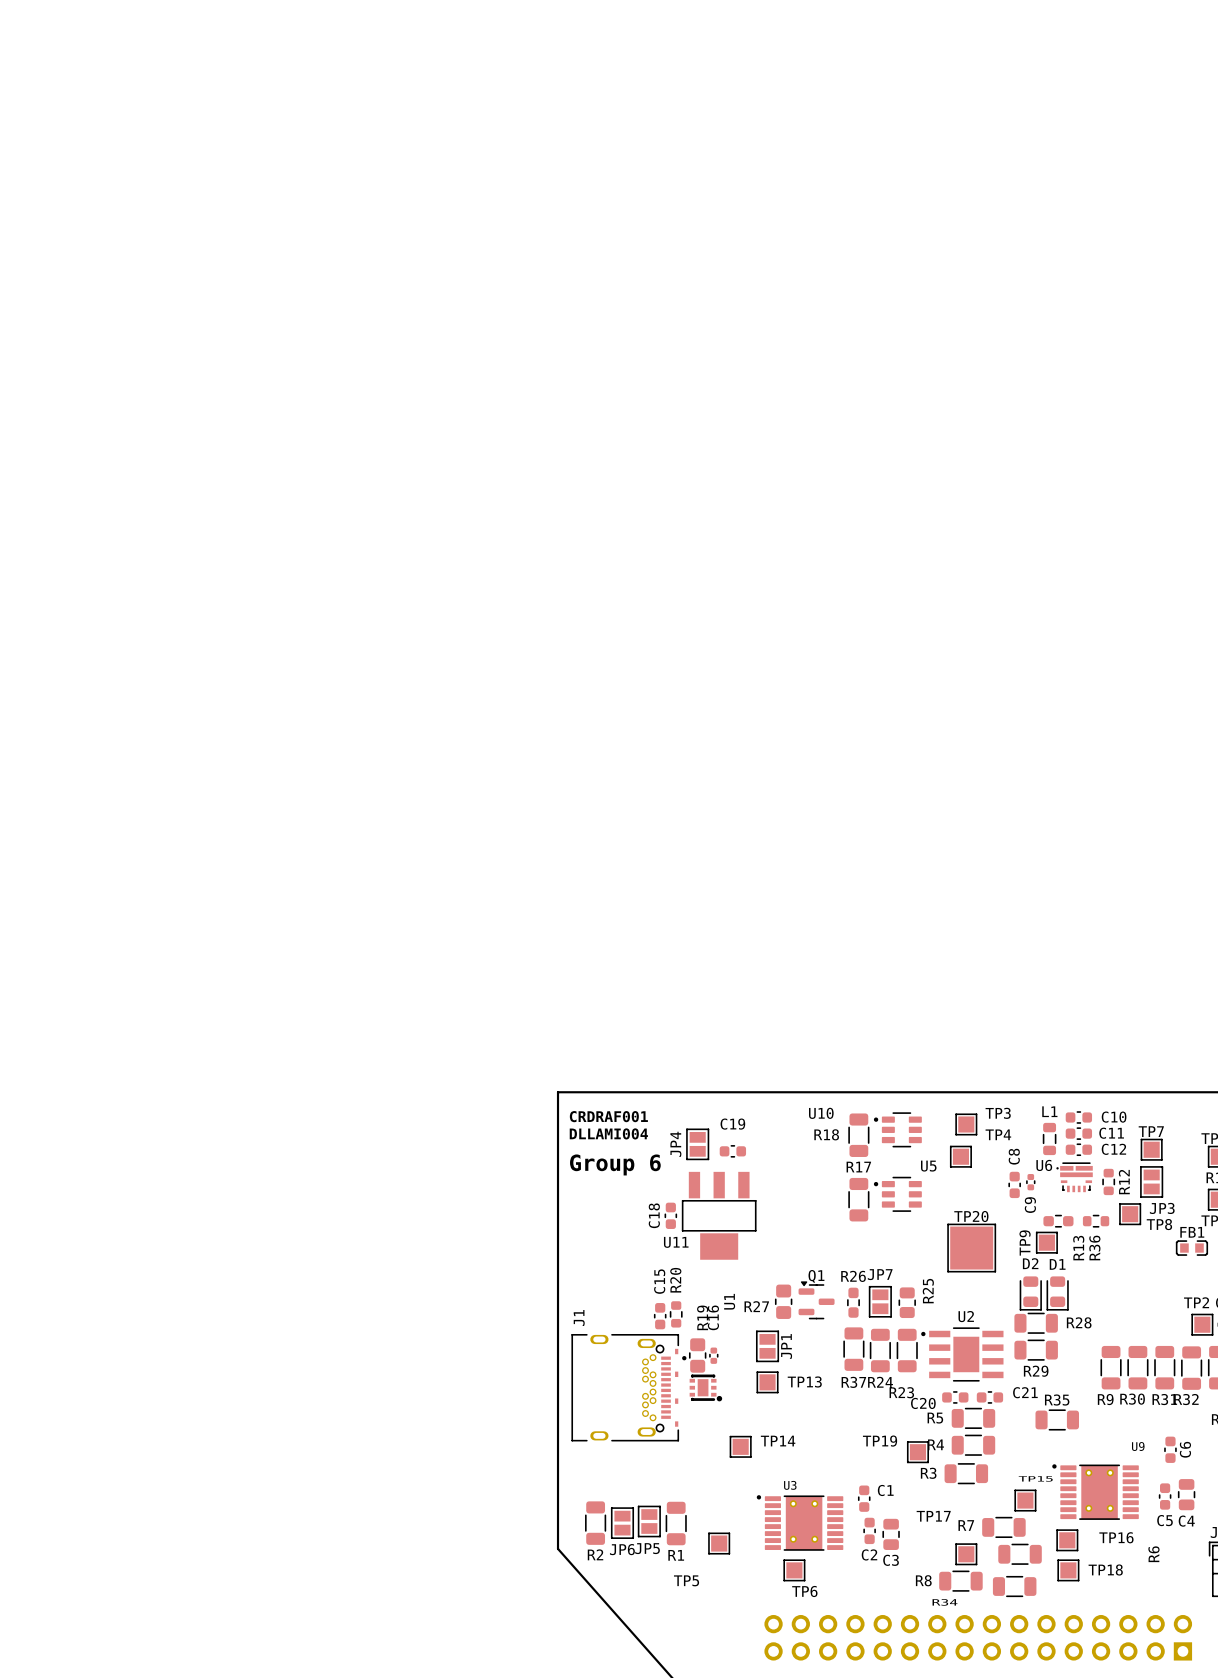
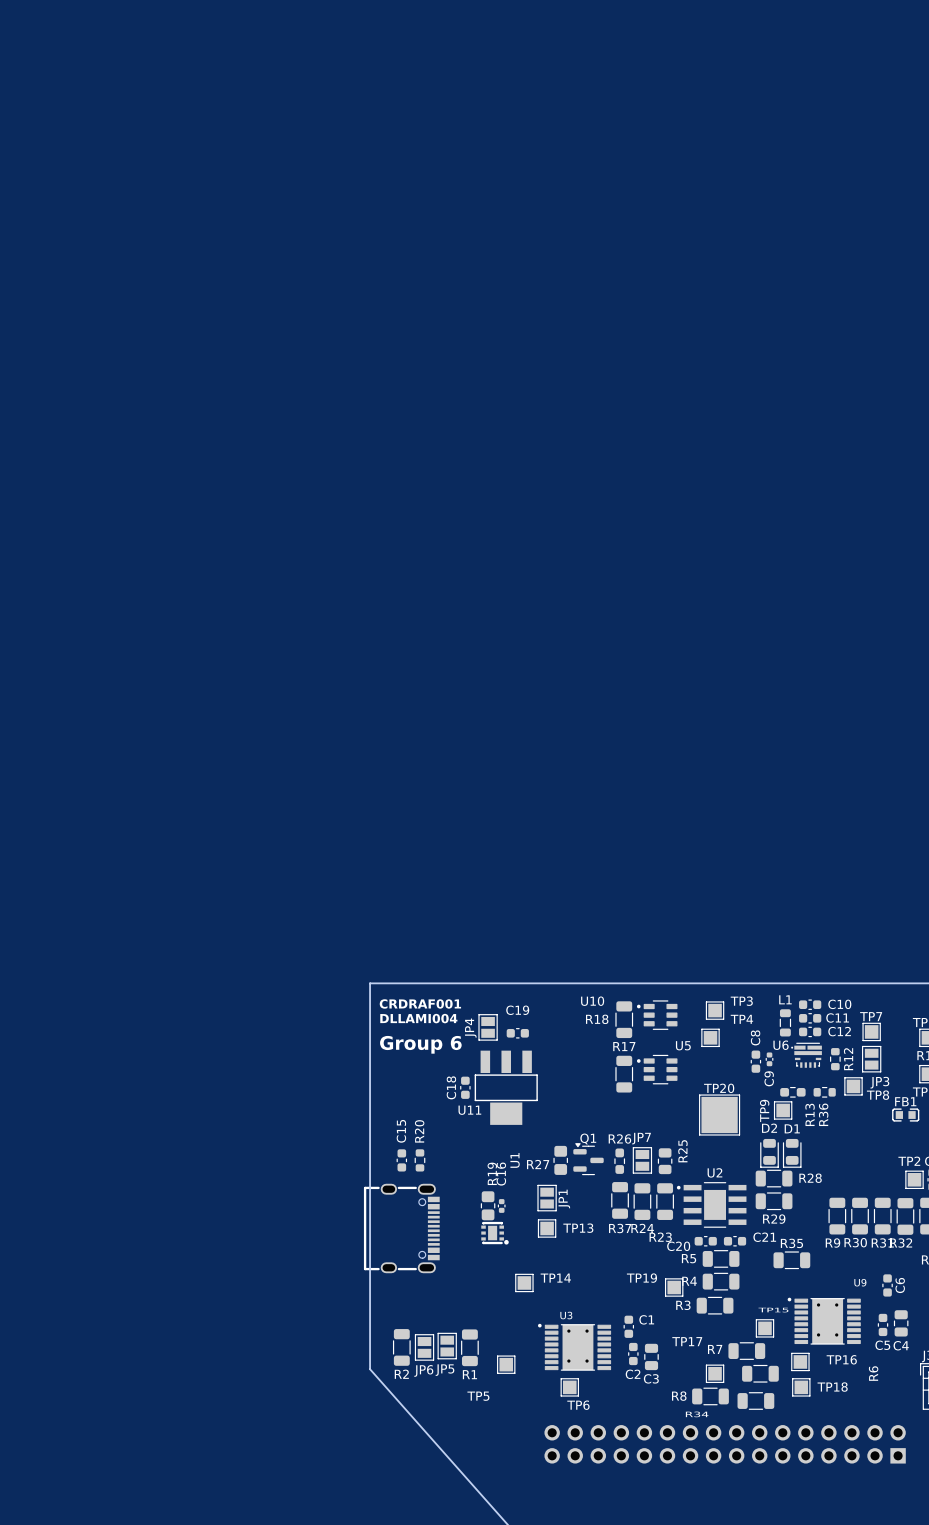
R20 position: (676, 1314) -> (419, 1160)
C15 position: (660, 1316) -> (401, 1160)
part: none -> (401, 1228)
J1: (628, 1387) -> none

